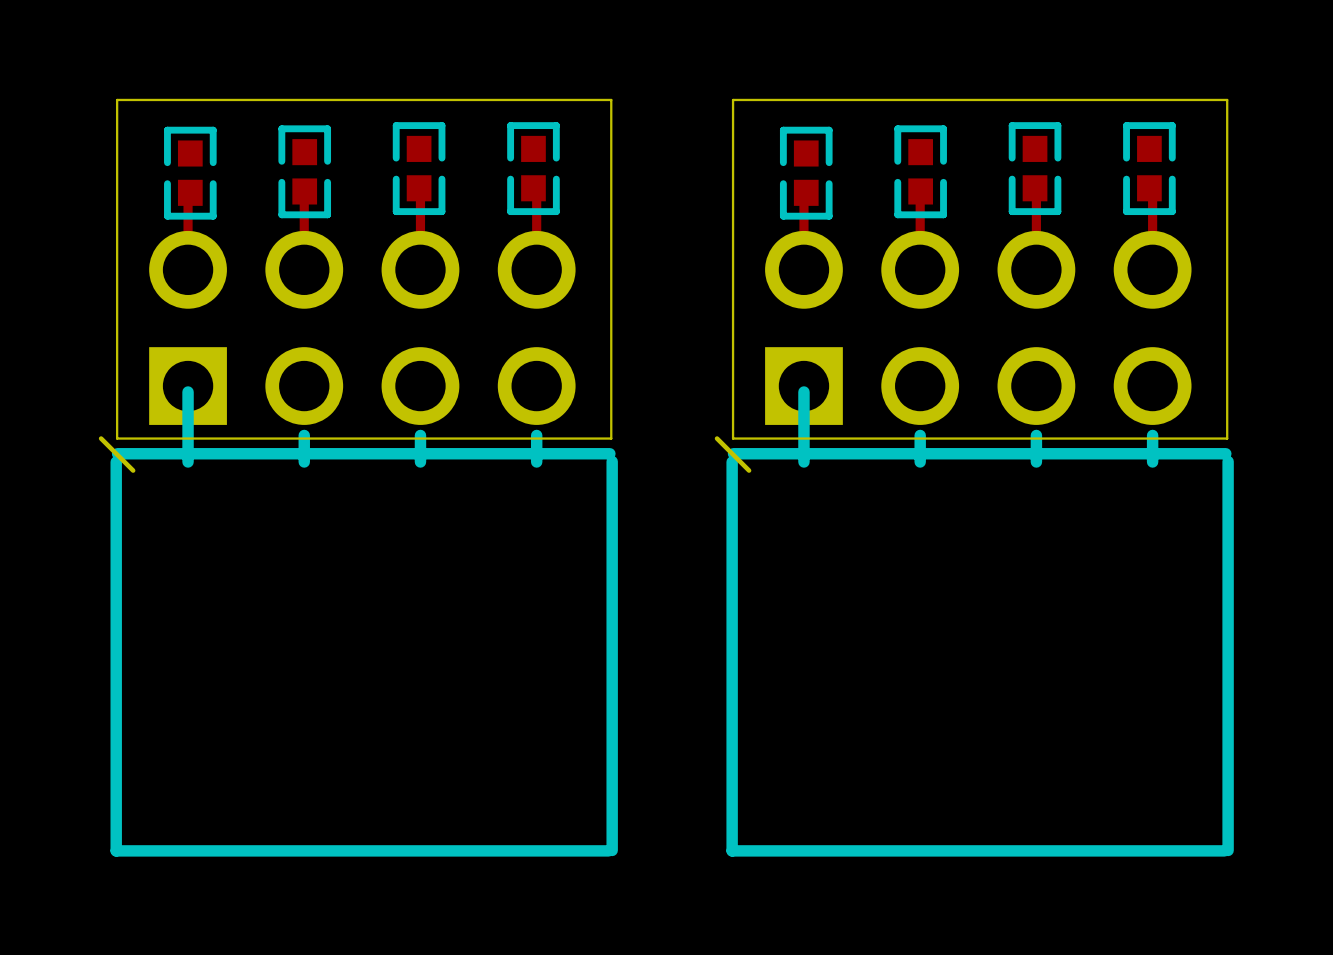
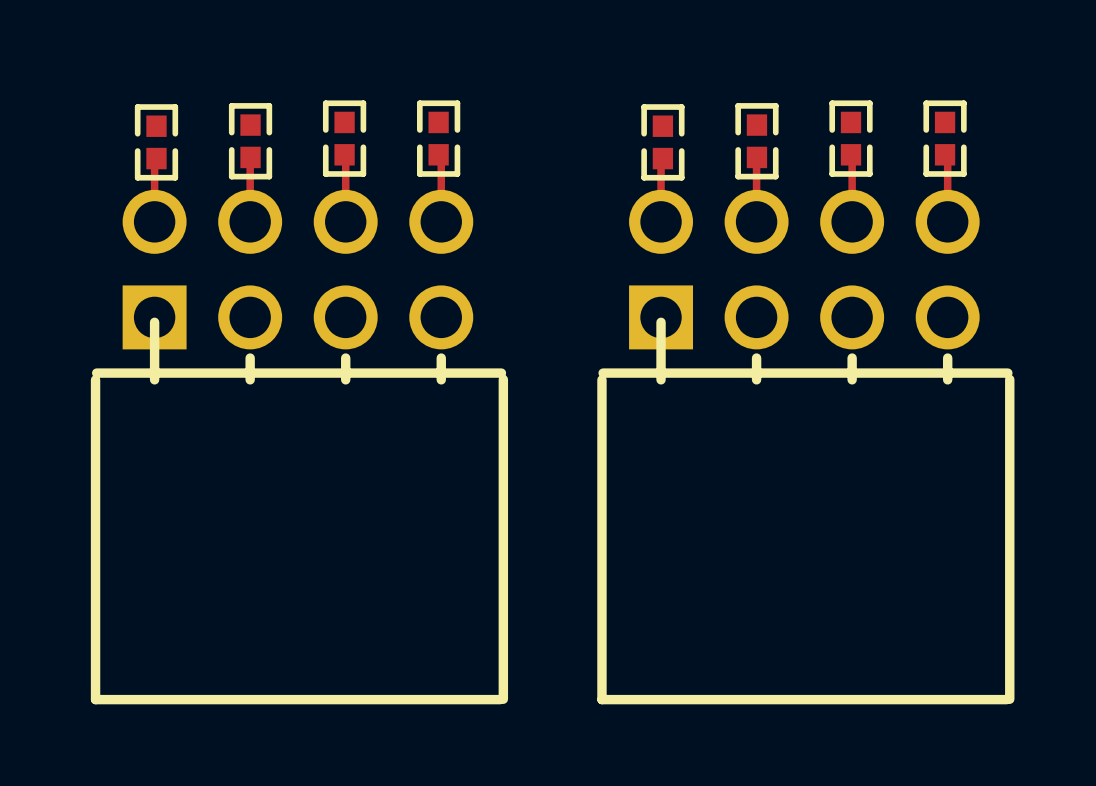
board edge: (117, 99) (611, 99) (611, 438) (117, 438) (117, 99) -> none
board edge: (733, 99) (1227, 99) (1227, 438) (733, 438) (733, 99) -> none
board edge: (101, 438) (133, 470) -> none
board edge: (717, 438) (749, 470) -> none

